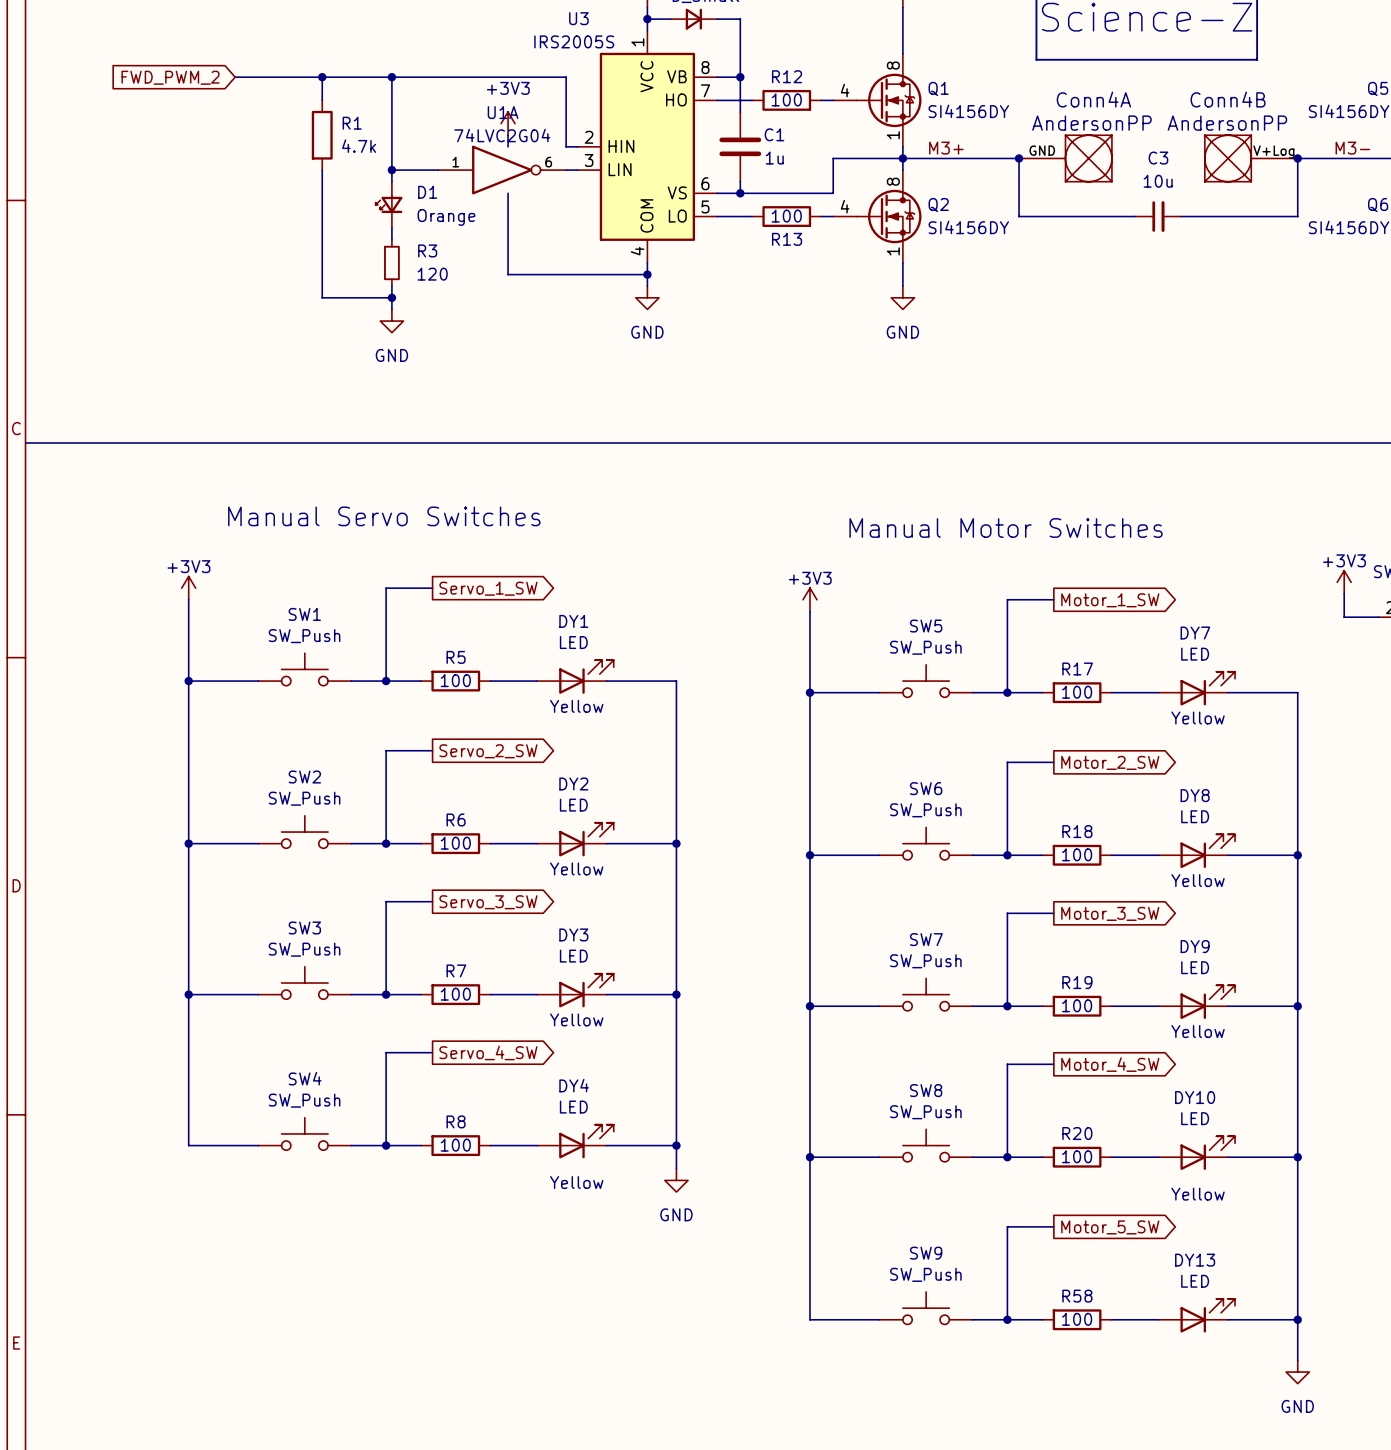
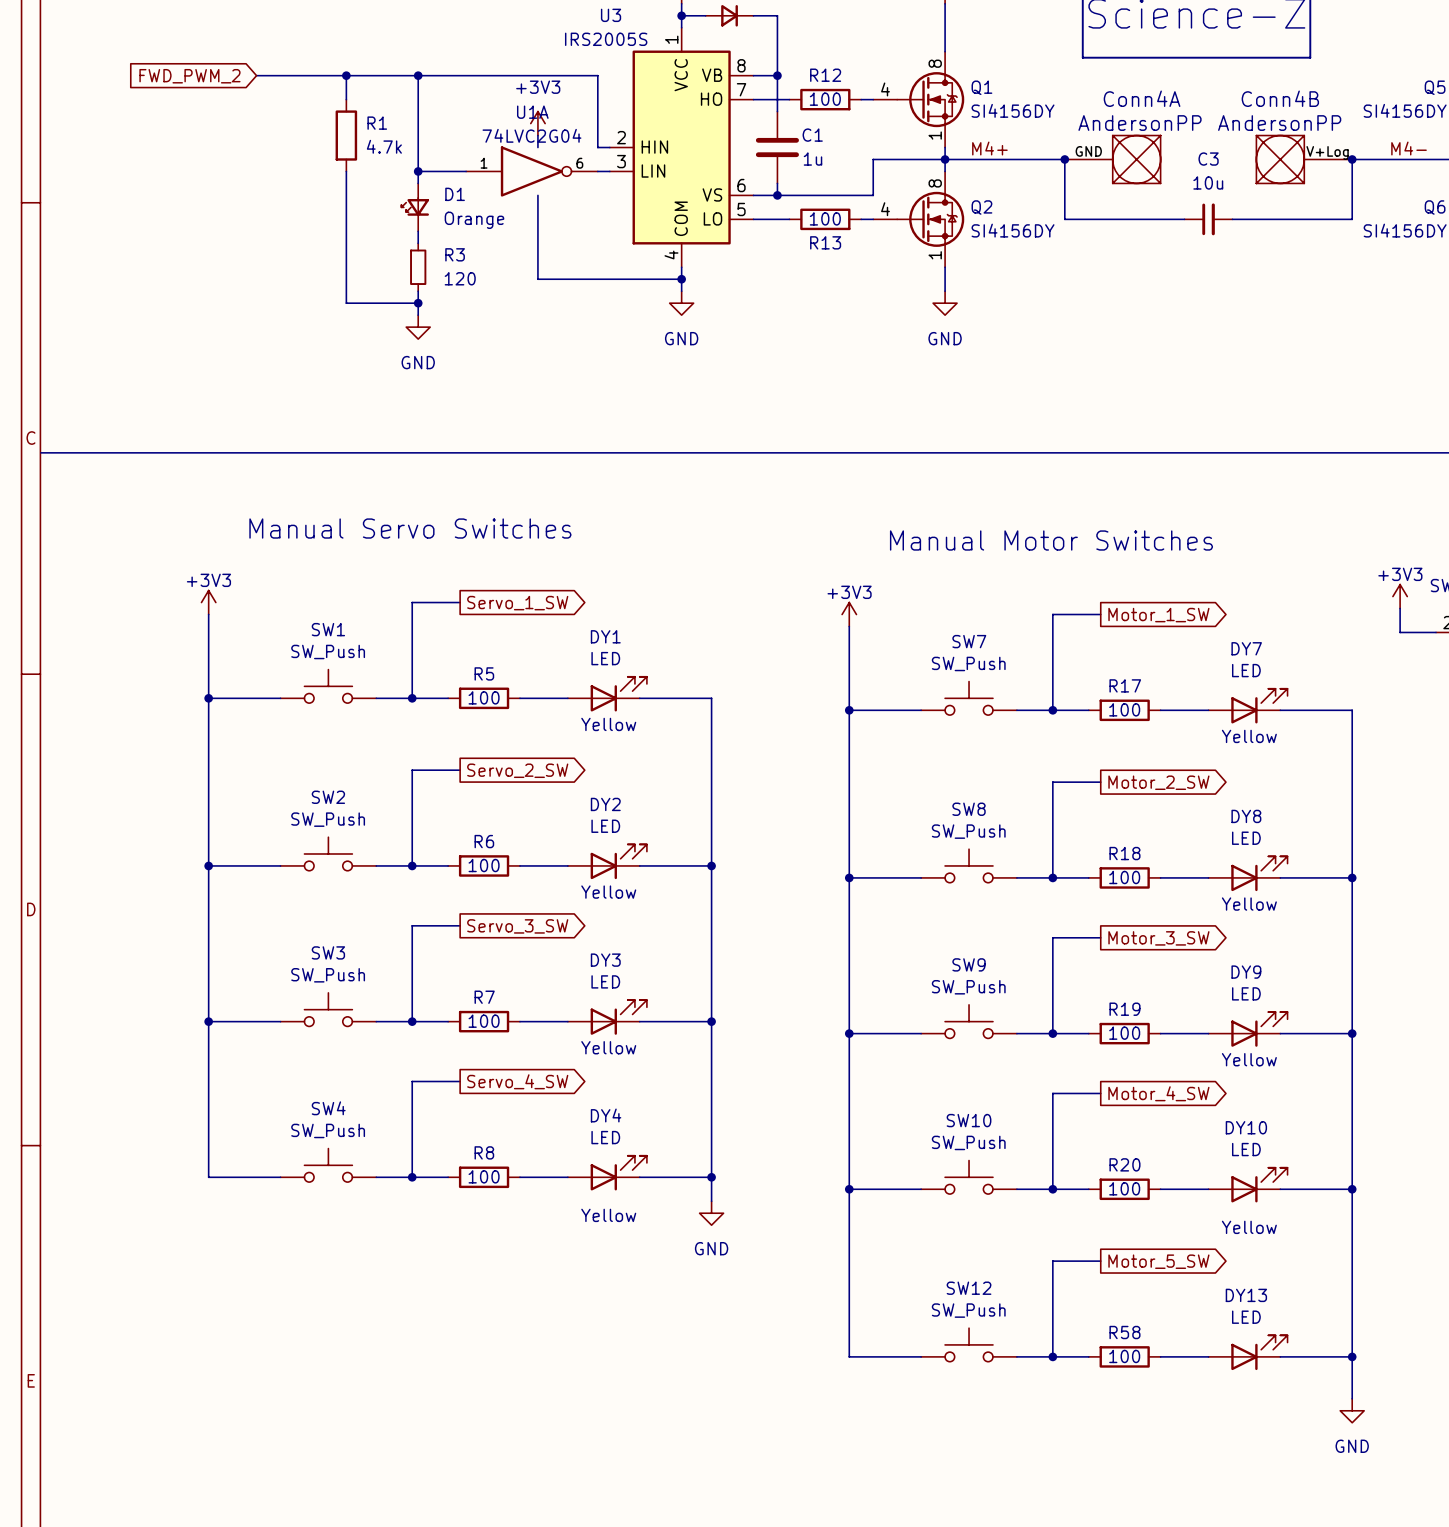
label: M3+ (946, 148) -> M4+ (989, 148)
label: M3- (1352, 148) -> M4- (1409, 148)
SW5 name: SW5 (926, 626) -> SW7 (969, 641)
SW6 name: SW6 (926, 788) -> SW8 (969, 809)
SW7 name: SW7 (926, 939) -> SW9 (969, 964)
SW8 name: SW8 (926, 1090) -> SW10 (969, 1120)
SW9 name: SW9 (926, 1253) -> SW12 (969, 1288)

